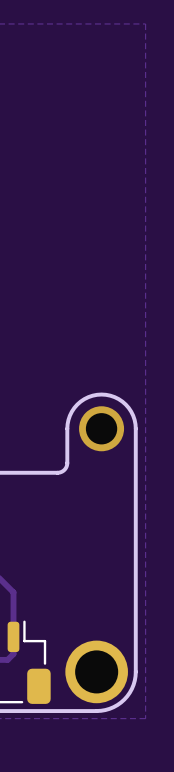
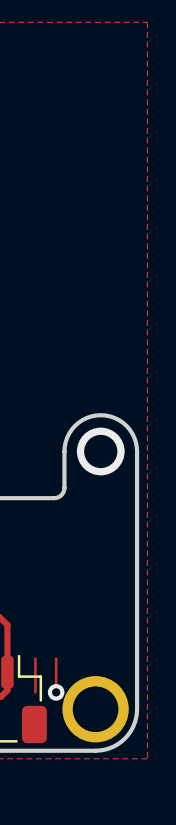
track: none -> (35, 658) (35, 692)
track: none -> (56, 658) (56, 692)
via: none -> (56, 692)

